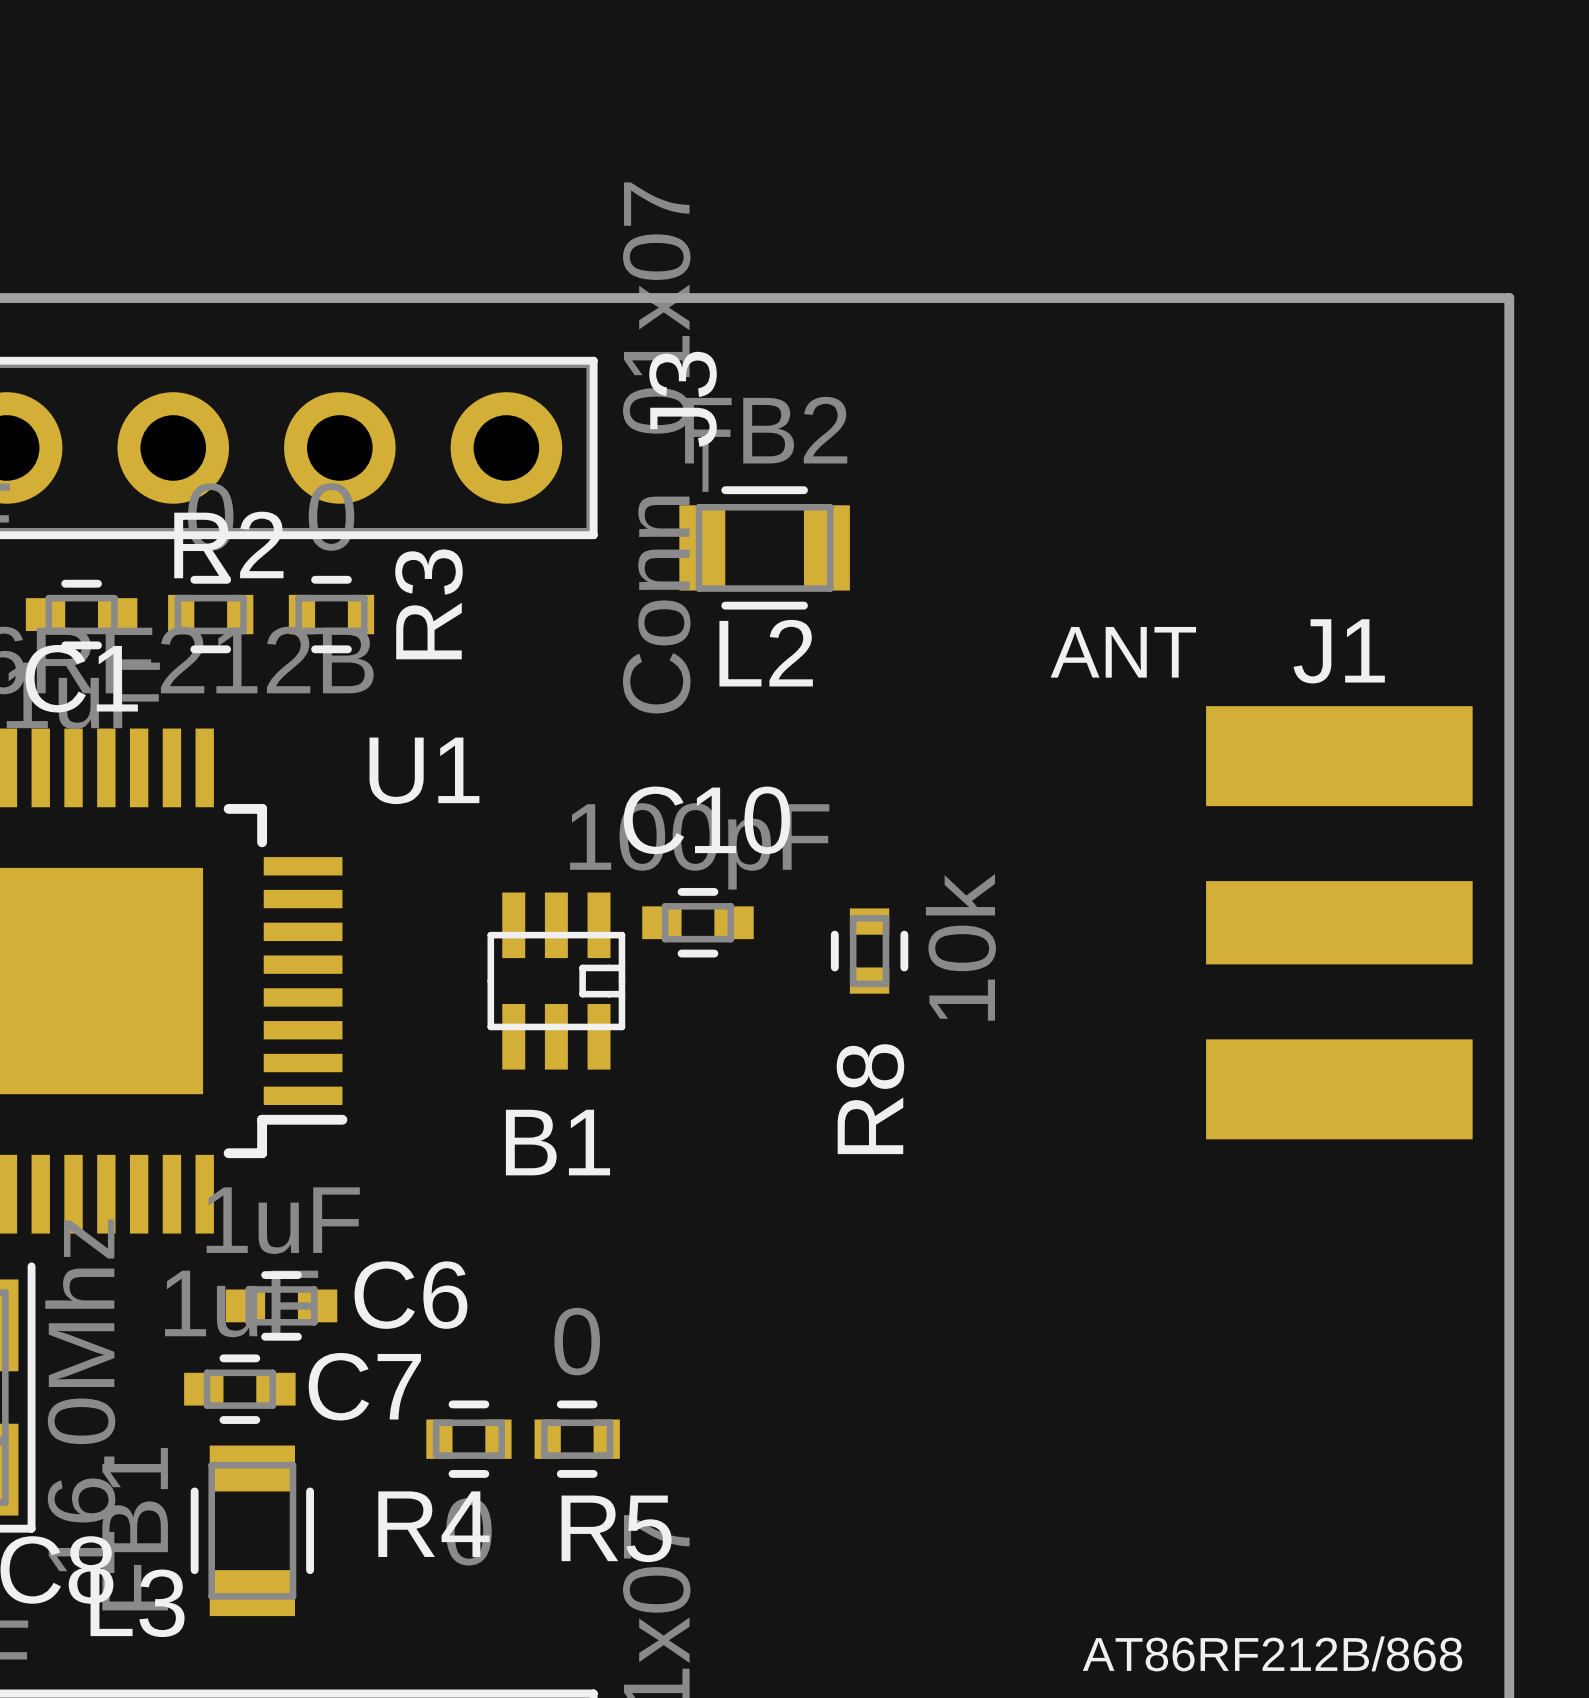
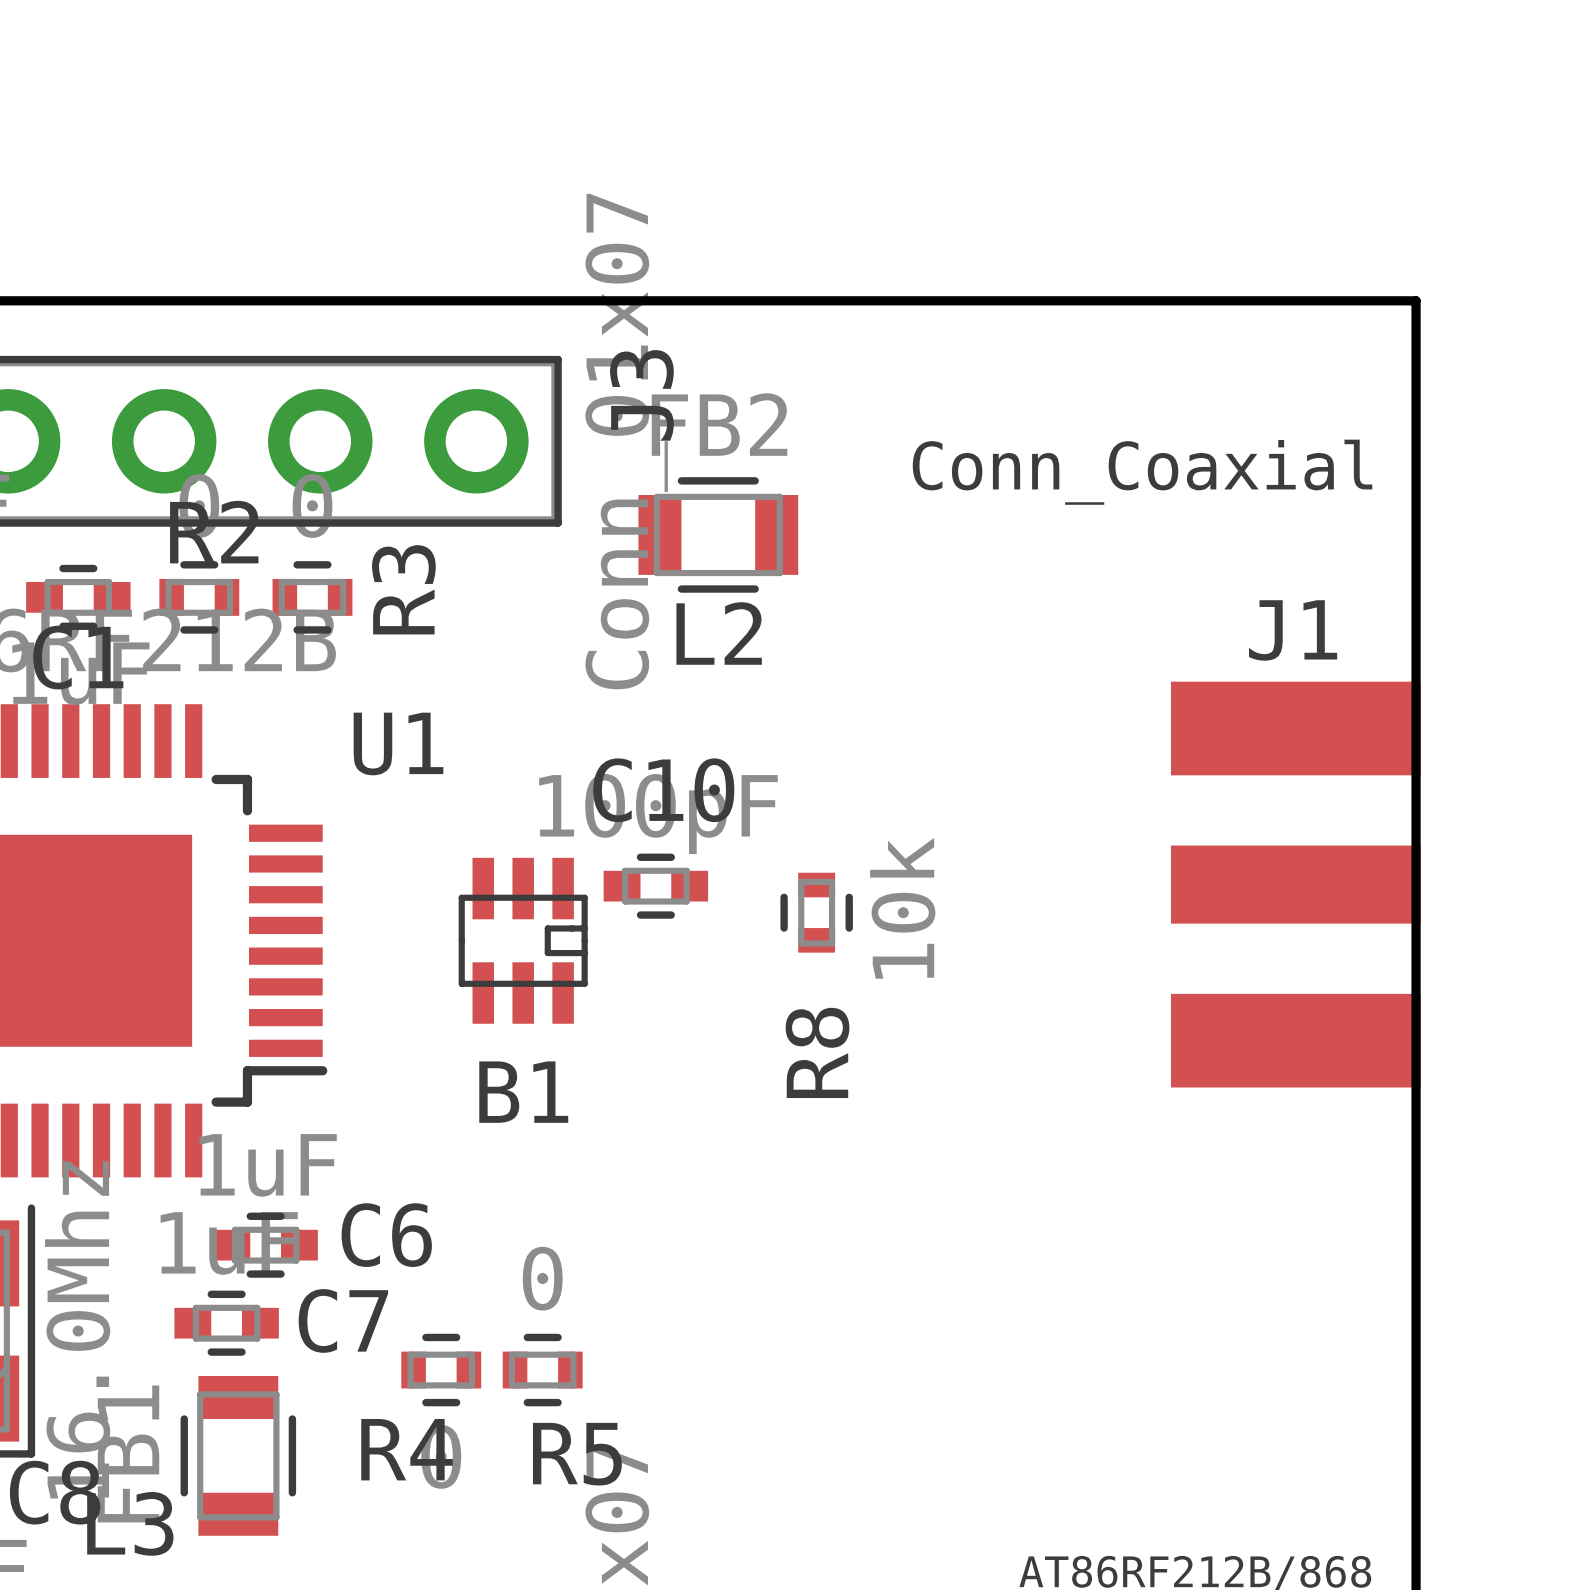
J1 value: ANT (1123, 652) -> Conn_Coaxial (1142, 472)
J1 position: (1339, 922) -> (1295, 884)

